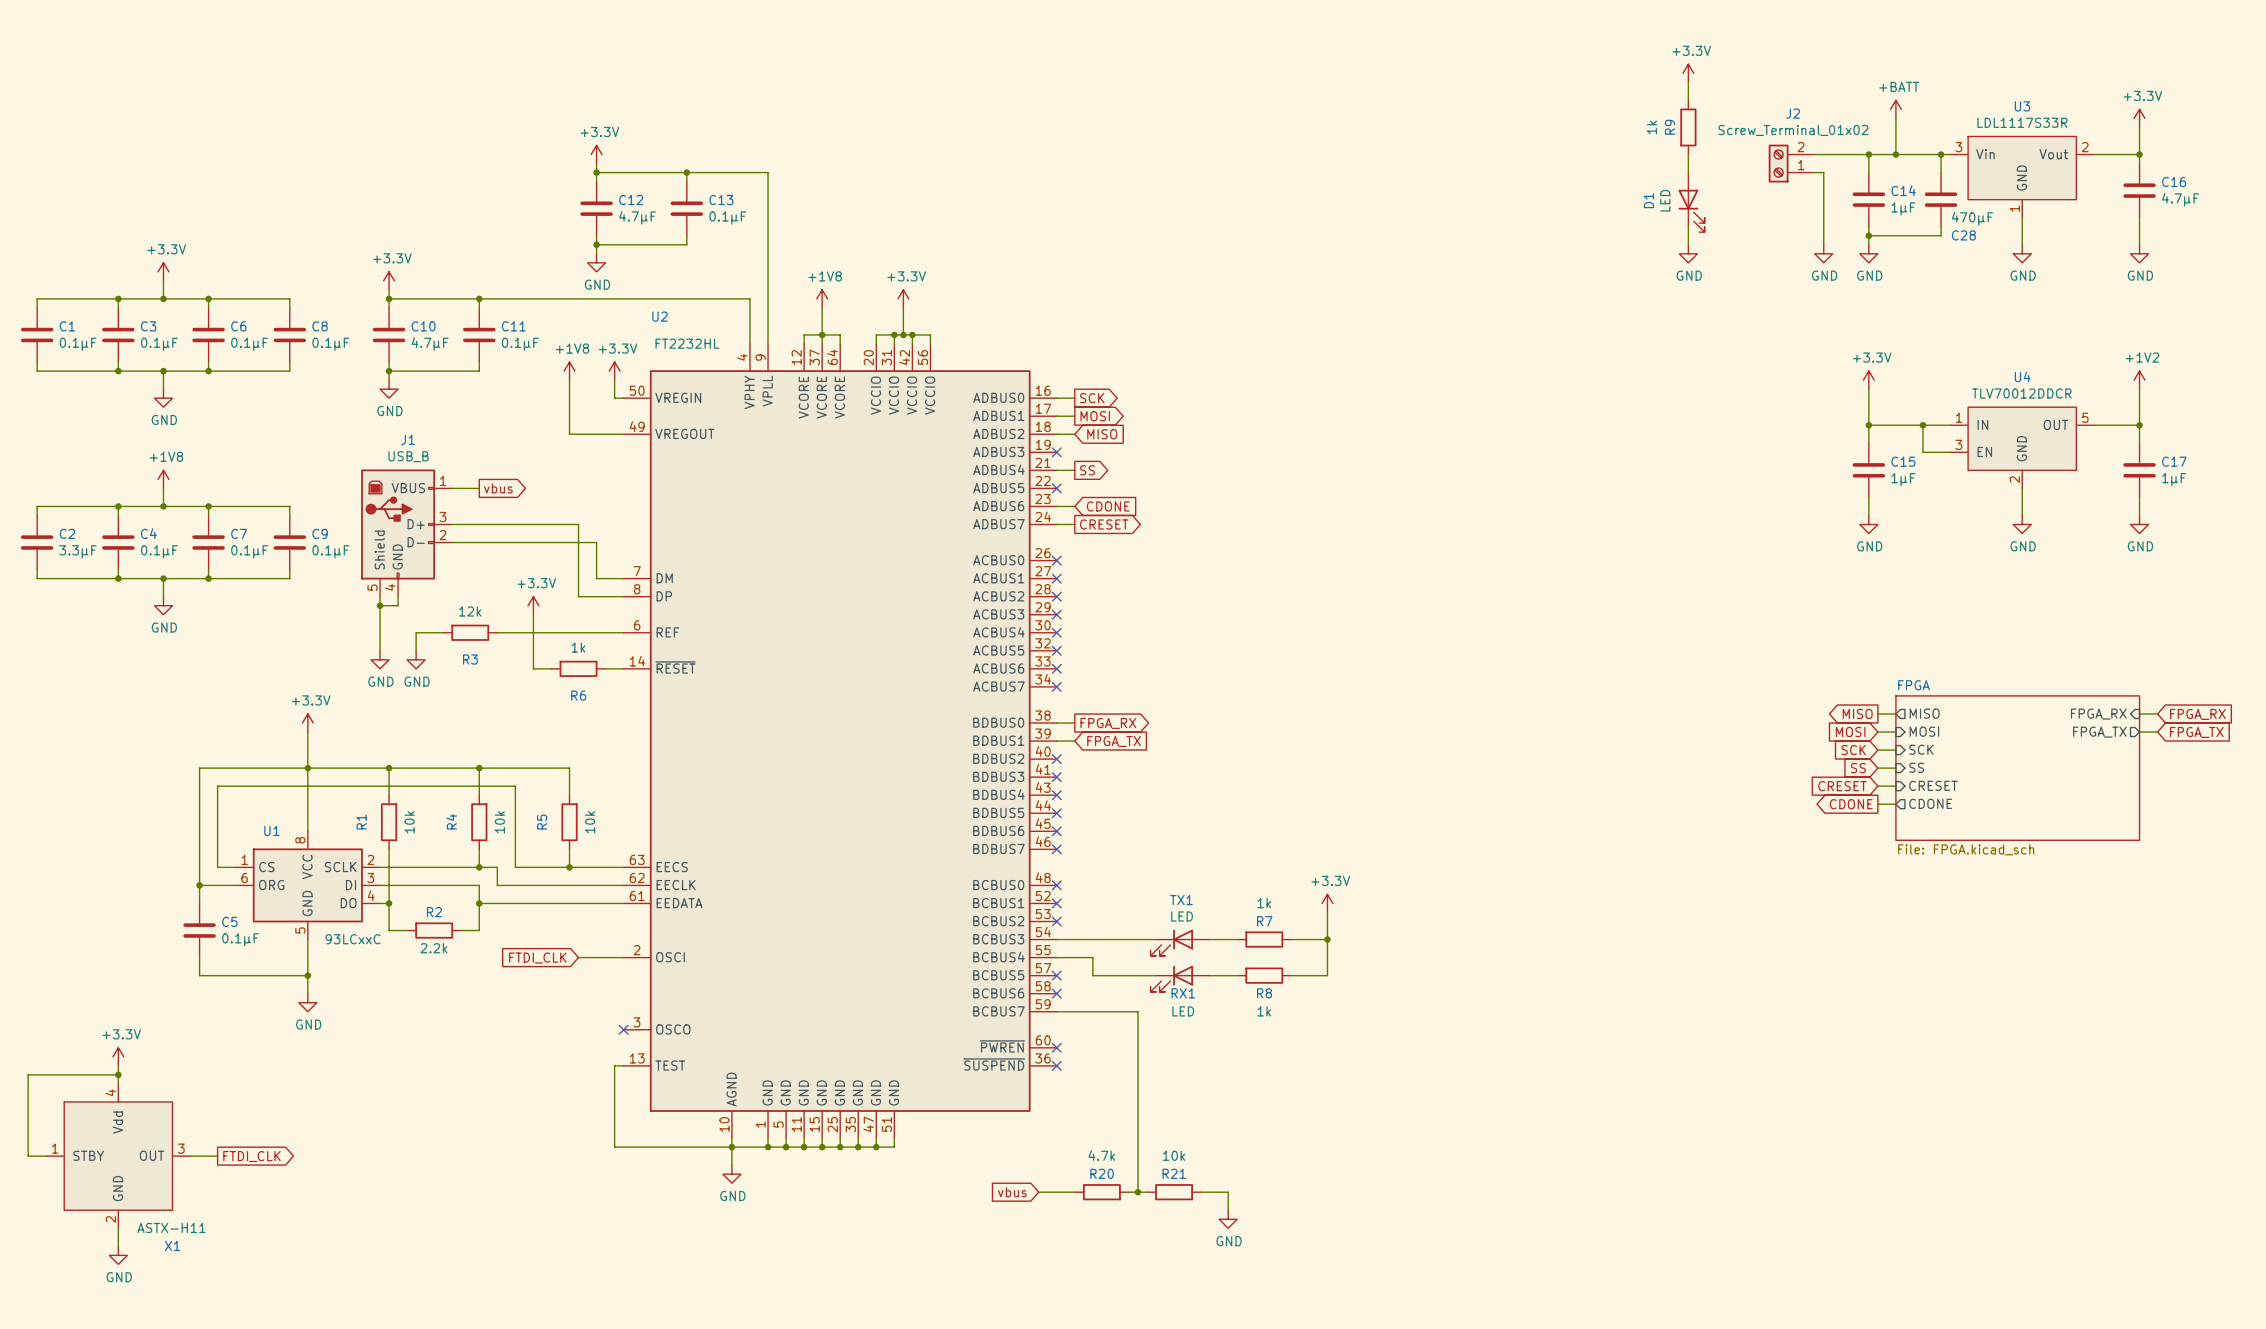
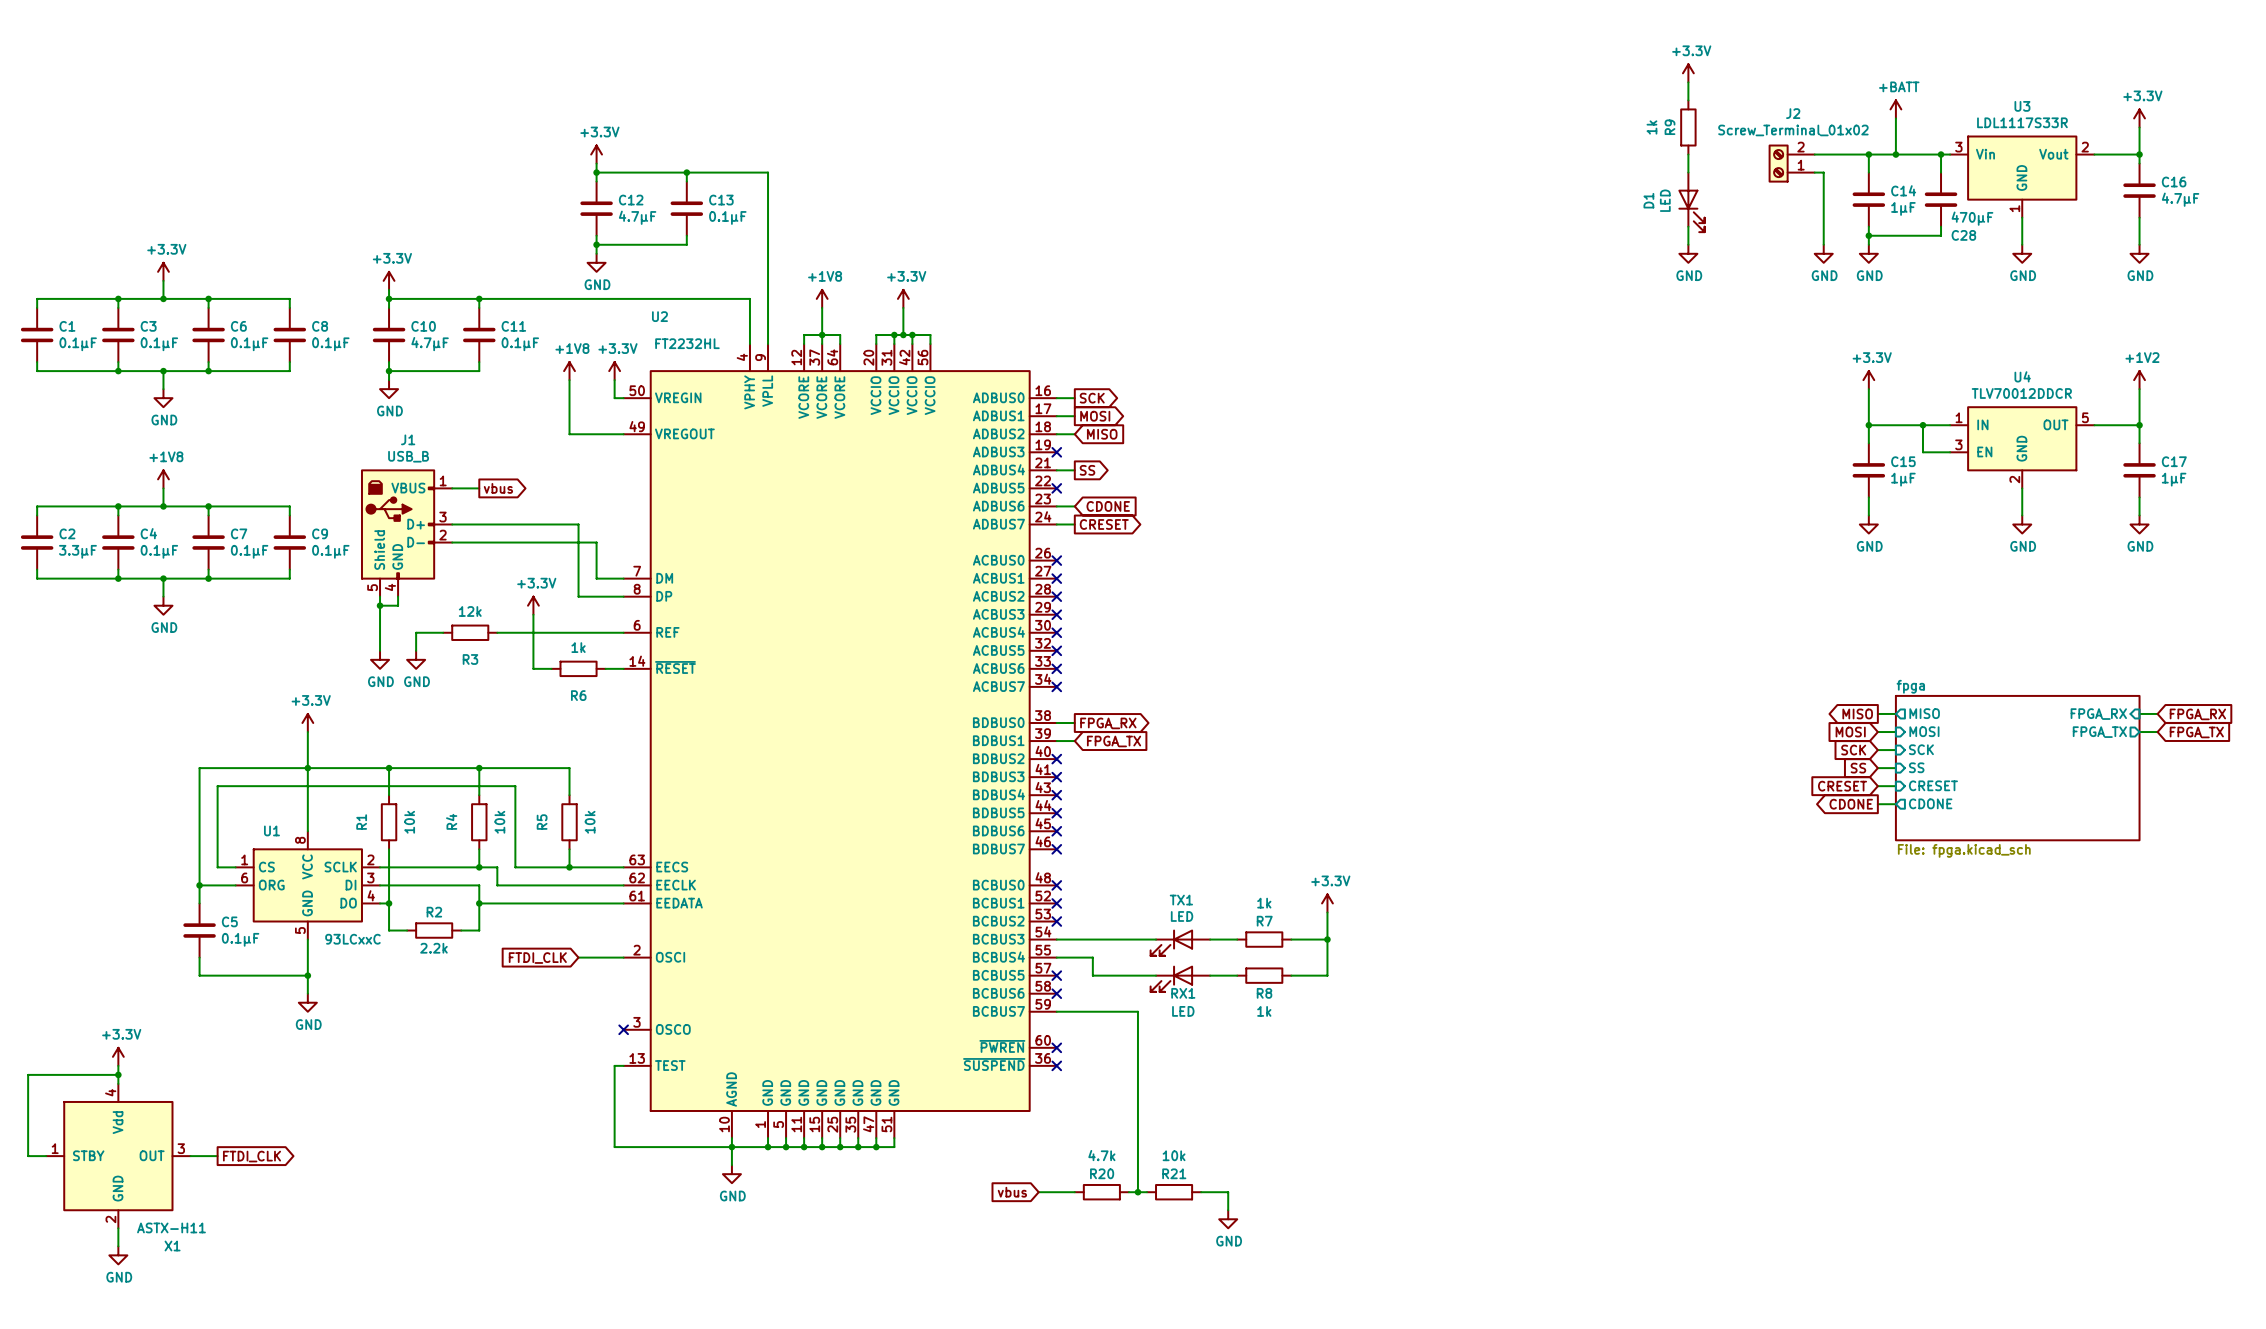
sheet FPGA name: FPGA (1914, 685) -> fpga (1910, 686)
sheet FPGA value: File: FPGA.kicad_sch (1966, 849) -> File: fpga.kicad_sch (1964, 850)

